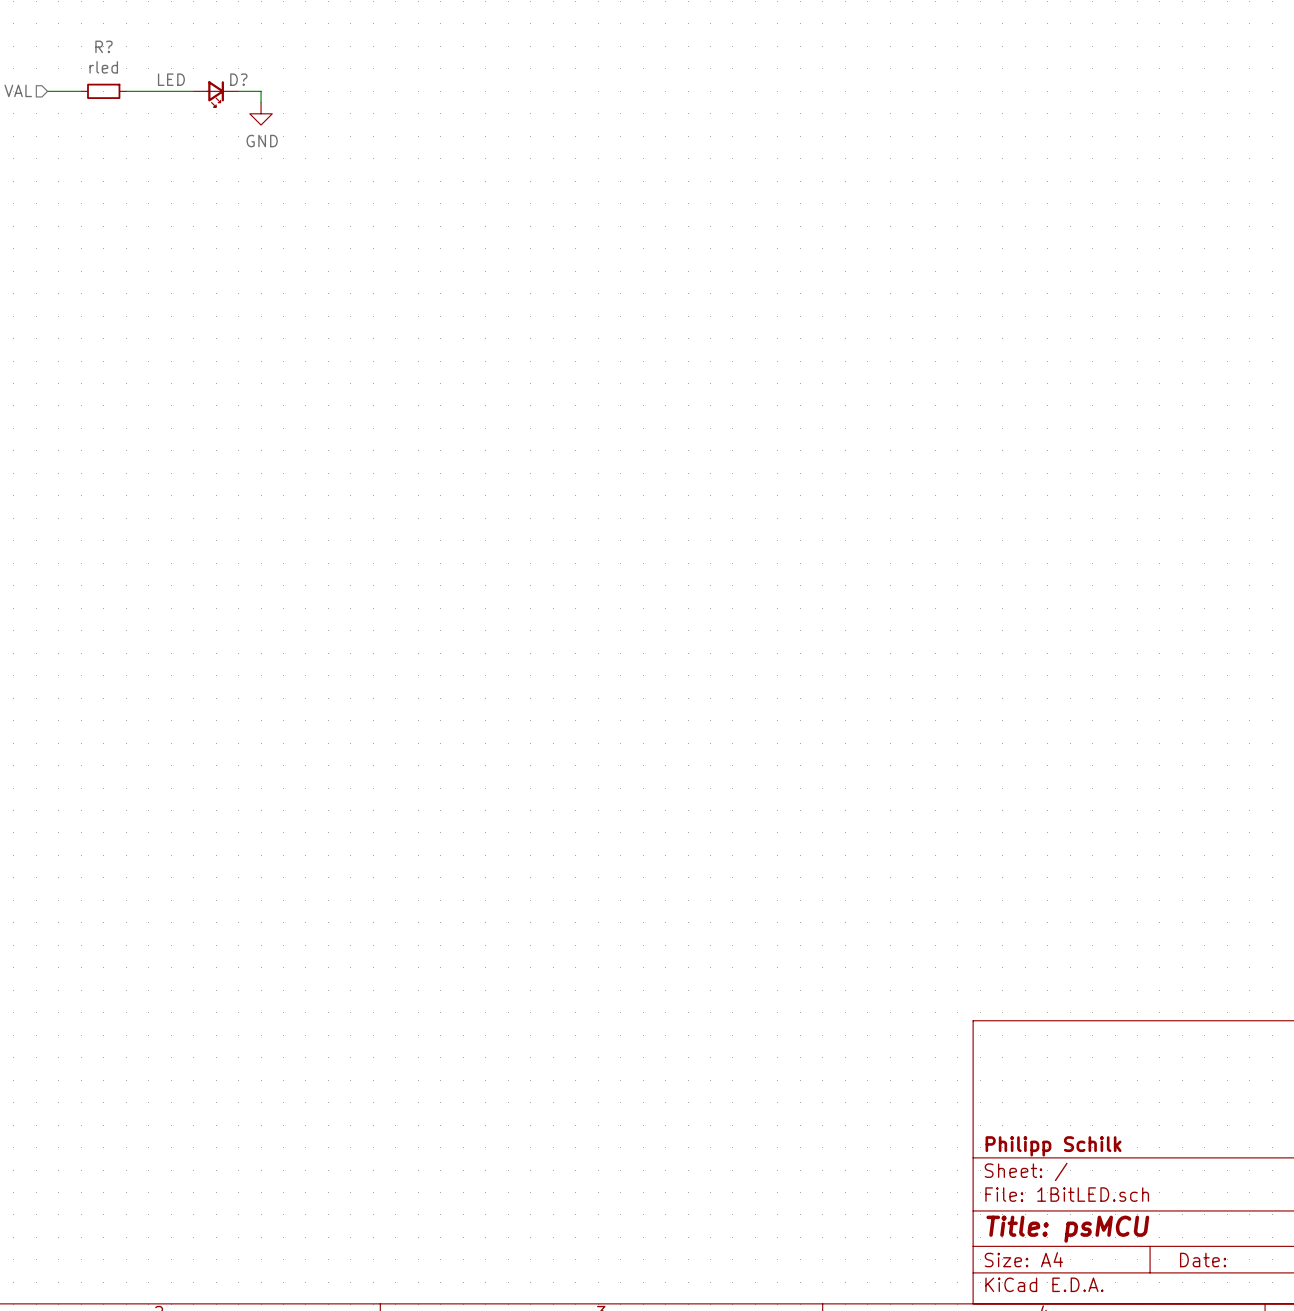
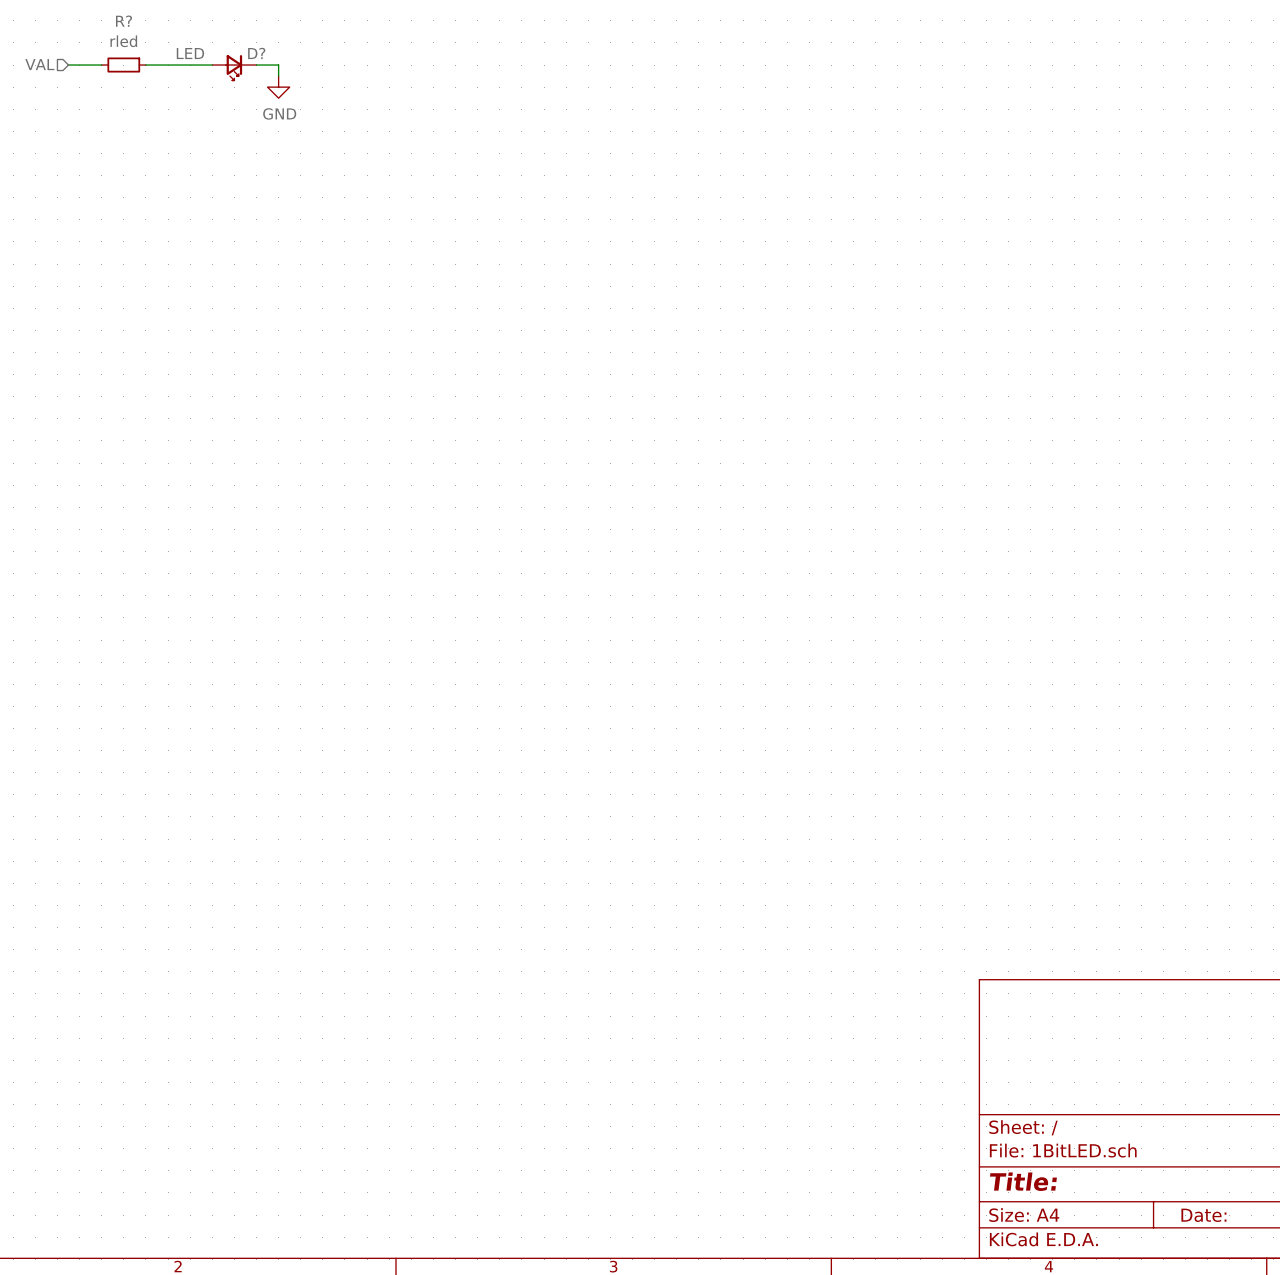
title block: Philipp Schilk (1053, 1146) -> none
title block: Title: psMCU (1067, 1229) -> Title: (1023, 1181)

